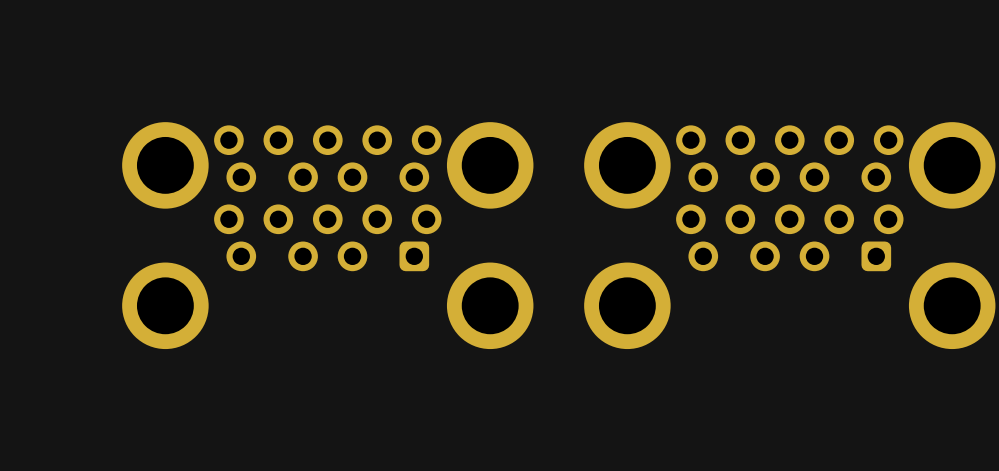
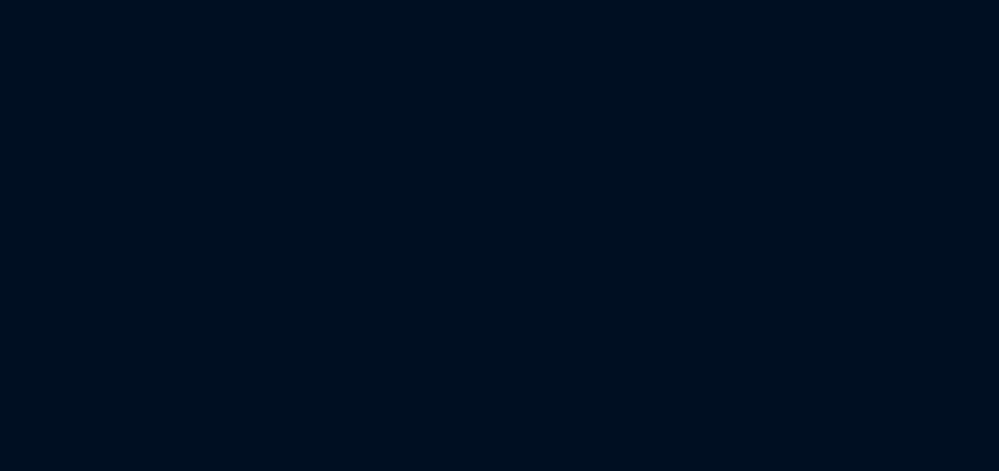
part: (327, 235) -> none
part: (789, 235) -> none

